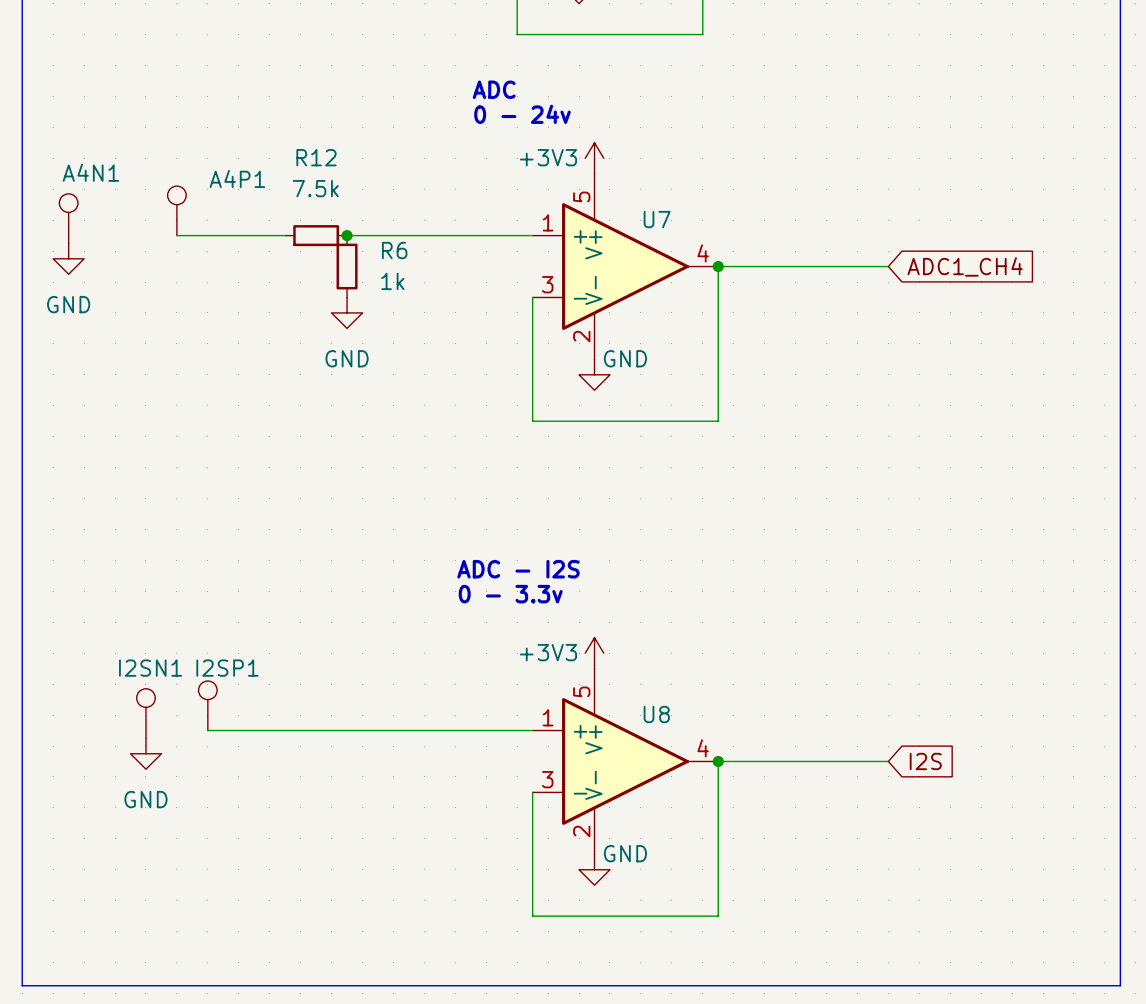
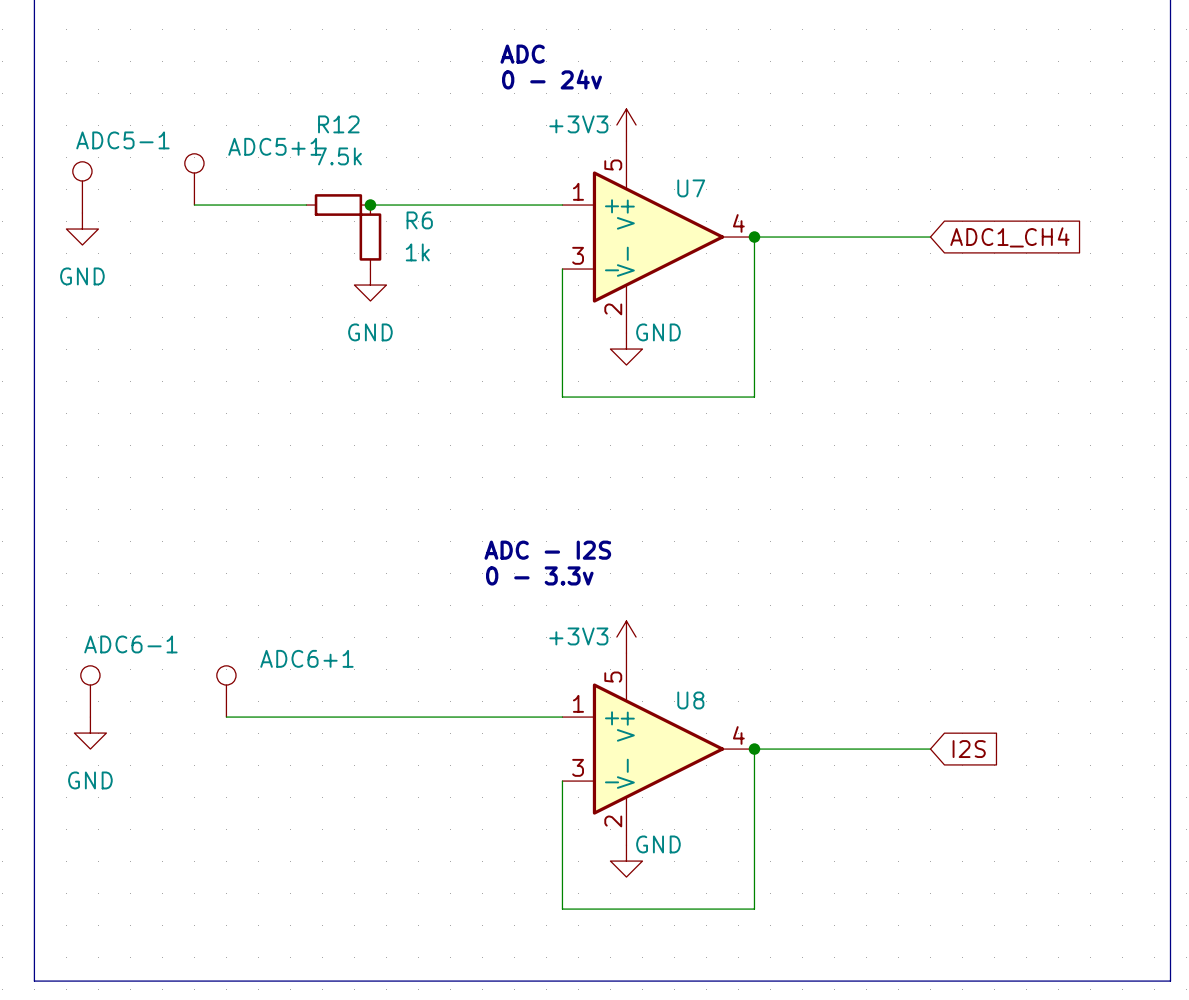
A4N1 name: A4N1 (90, 172) -> ADC5-1 (122, 140)
A4P1 name: A4P1 (237, 178) -> ADC5+1 (274, 146)
I2SP1 name: I2SP1 (227, 668) -> ADC6+1 (306, 658)
ADC6-1: none -> (90, 691)
I2SN1: (145, 713) -> none
power symbol position: GND (145, 753) -> GND (90, 733)

